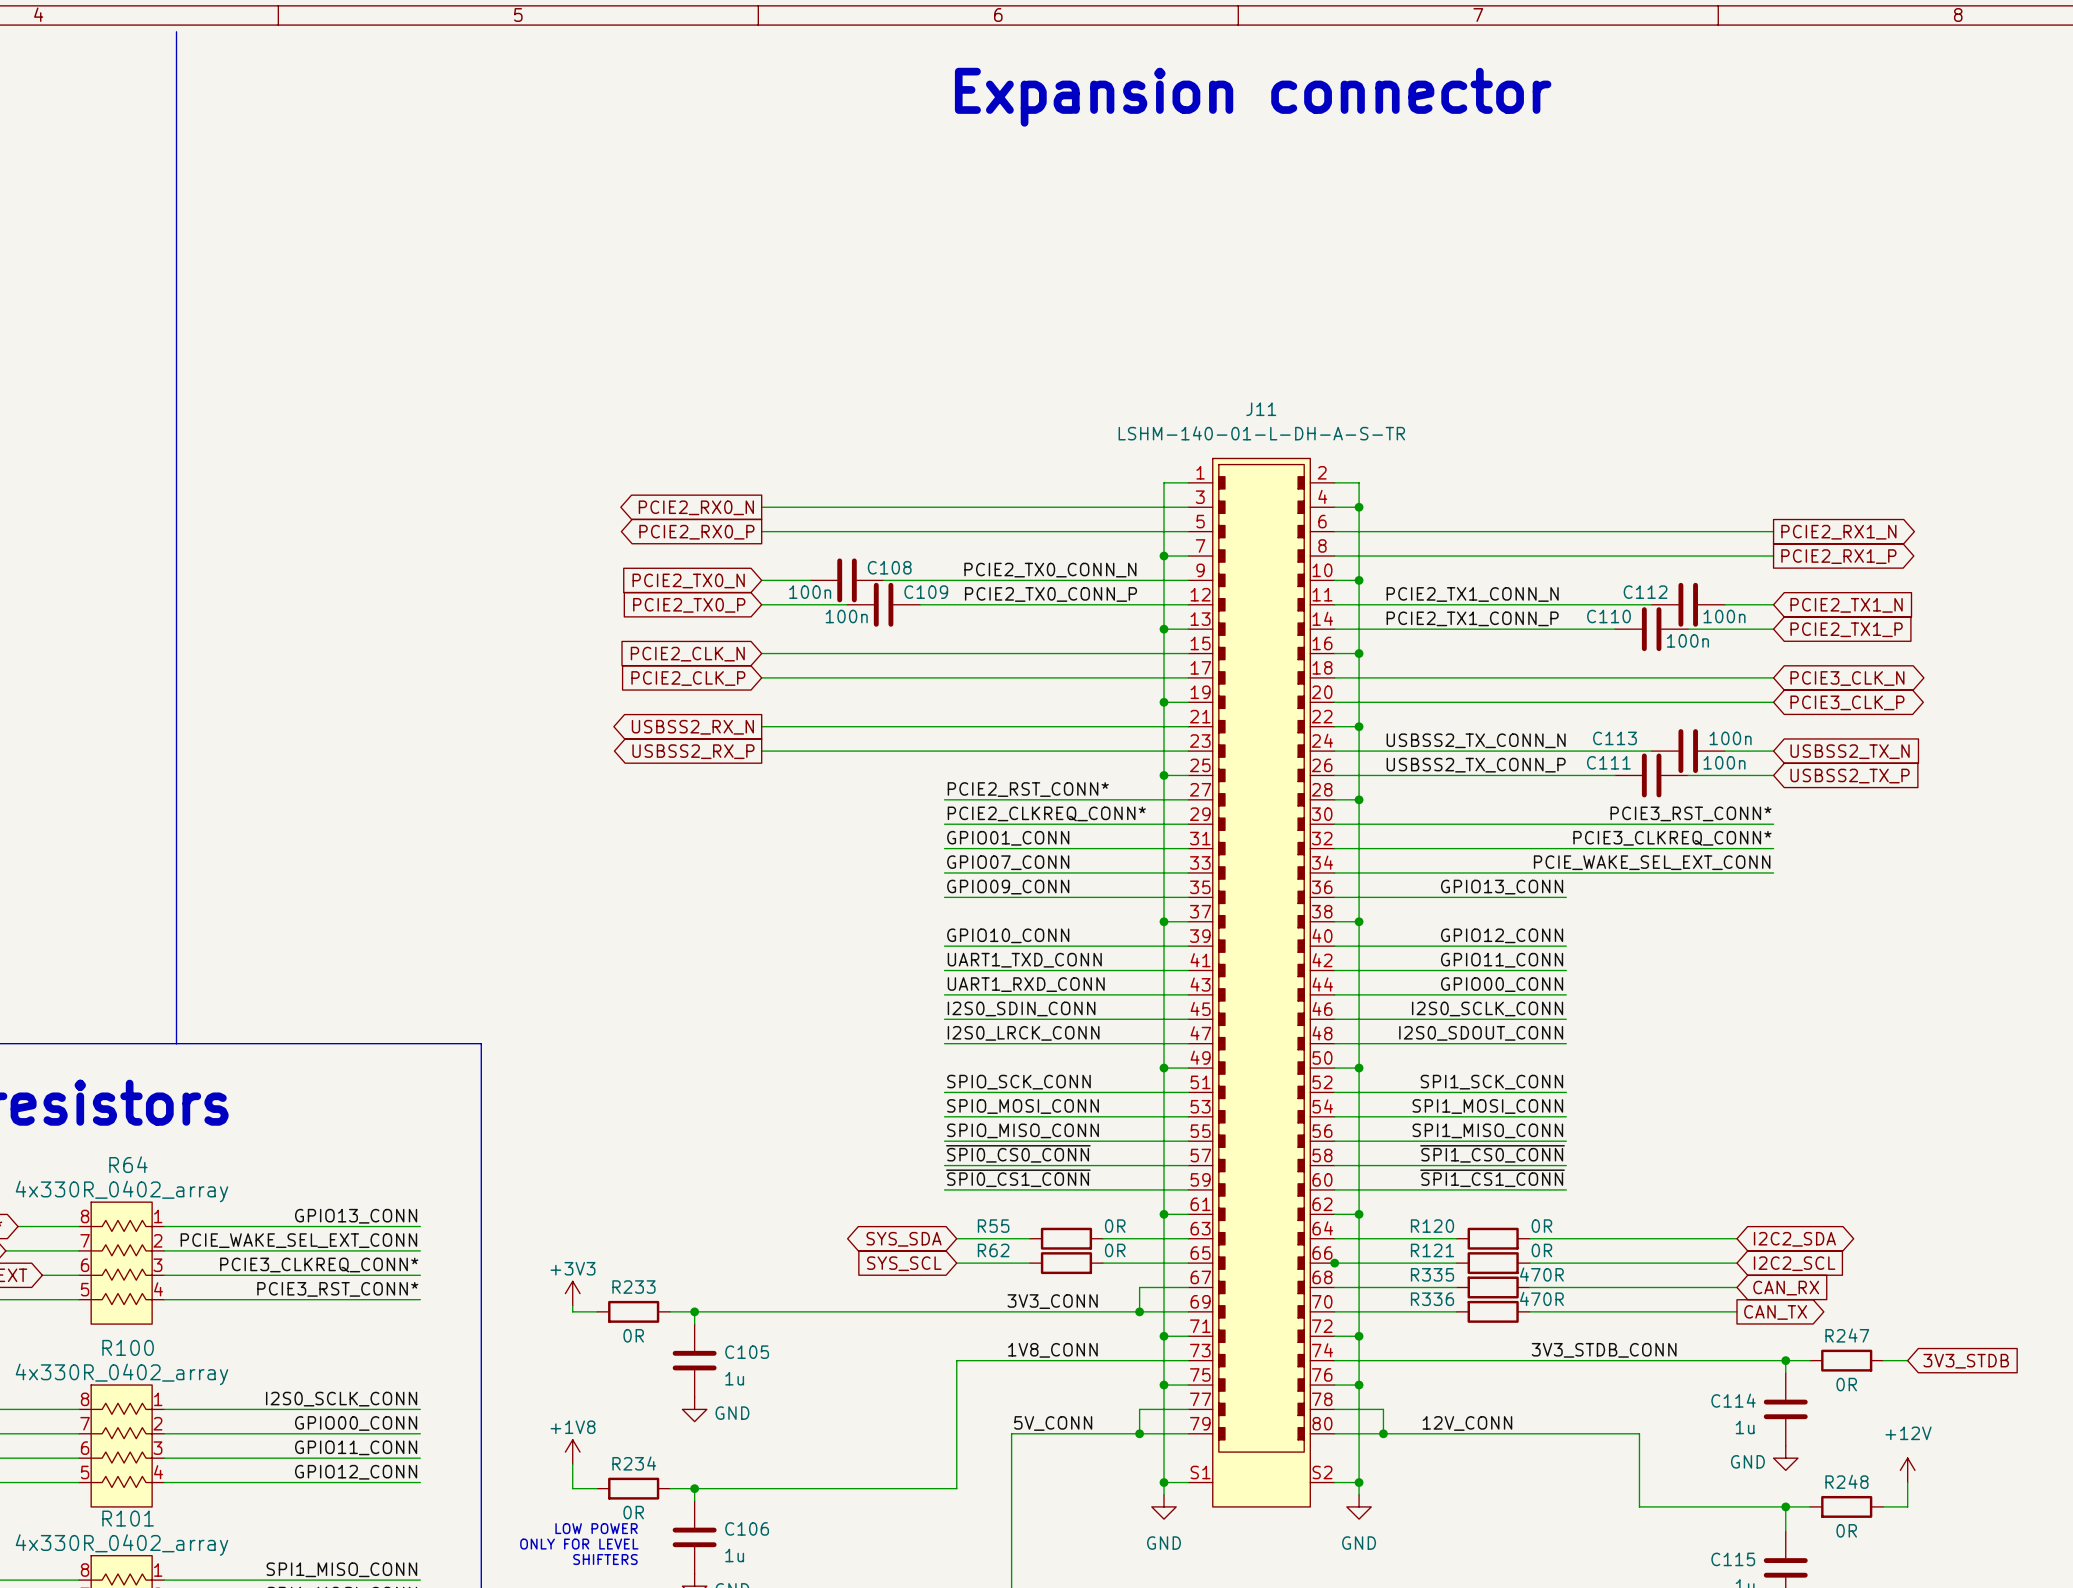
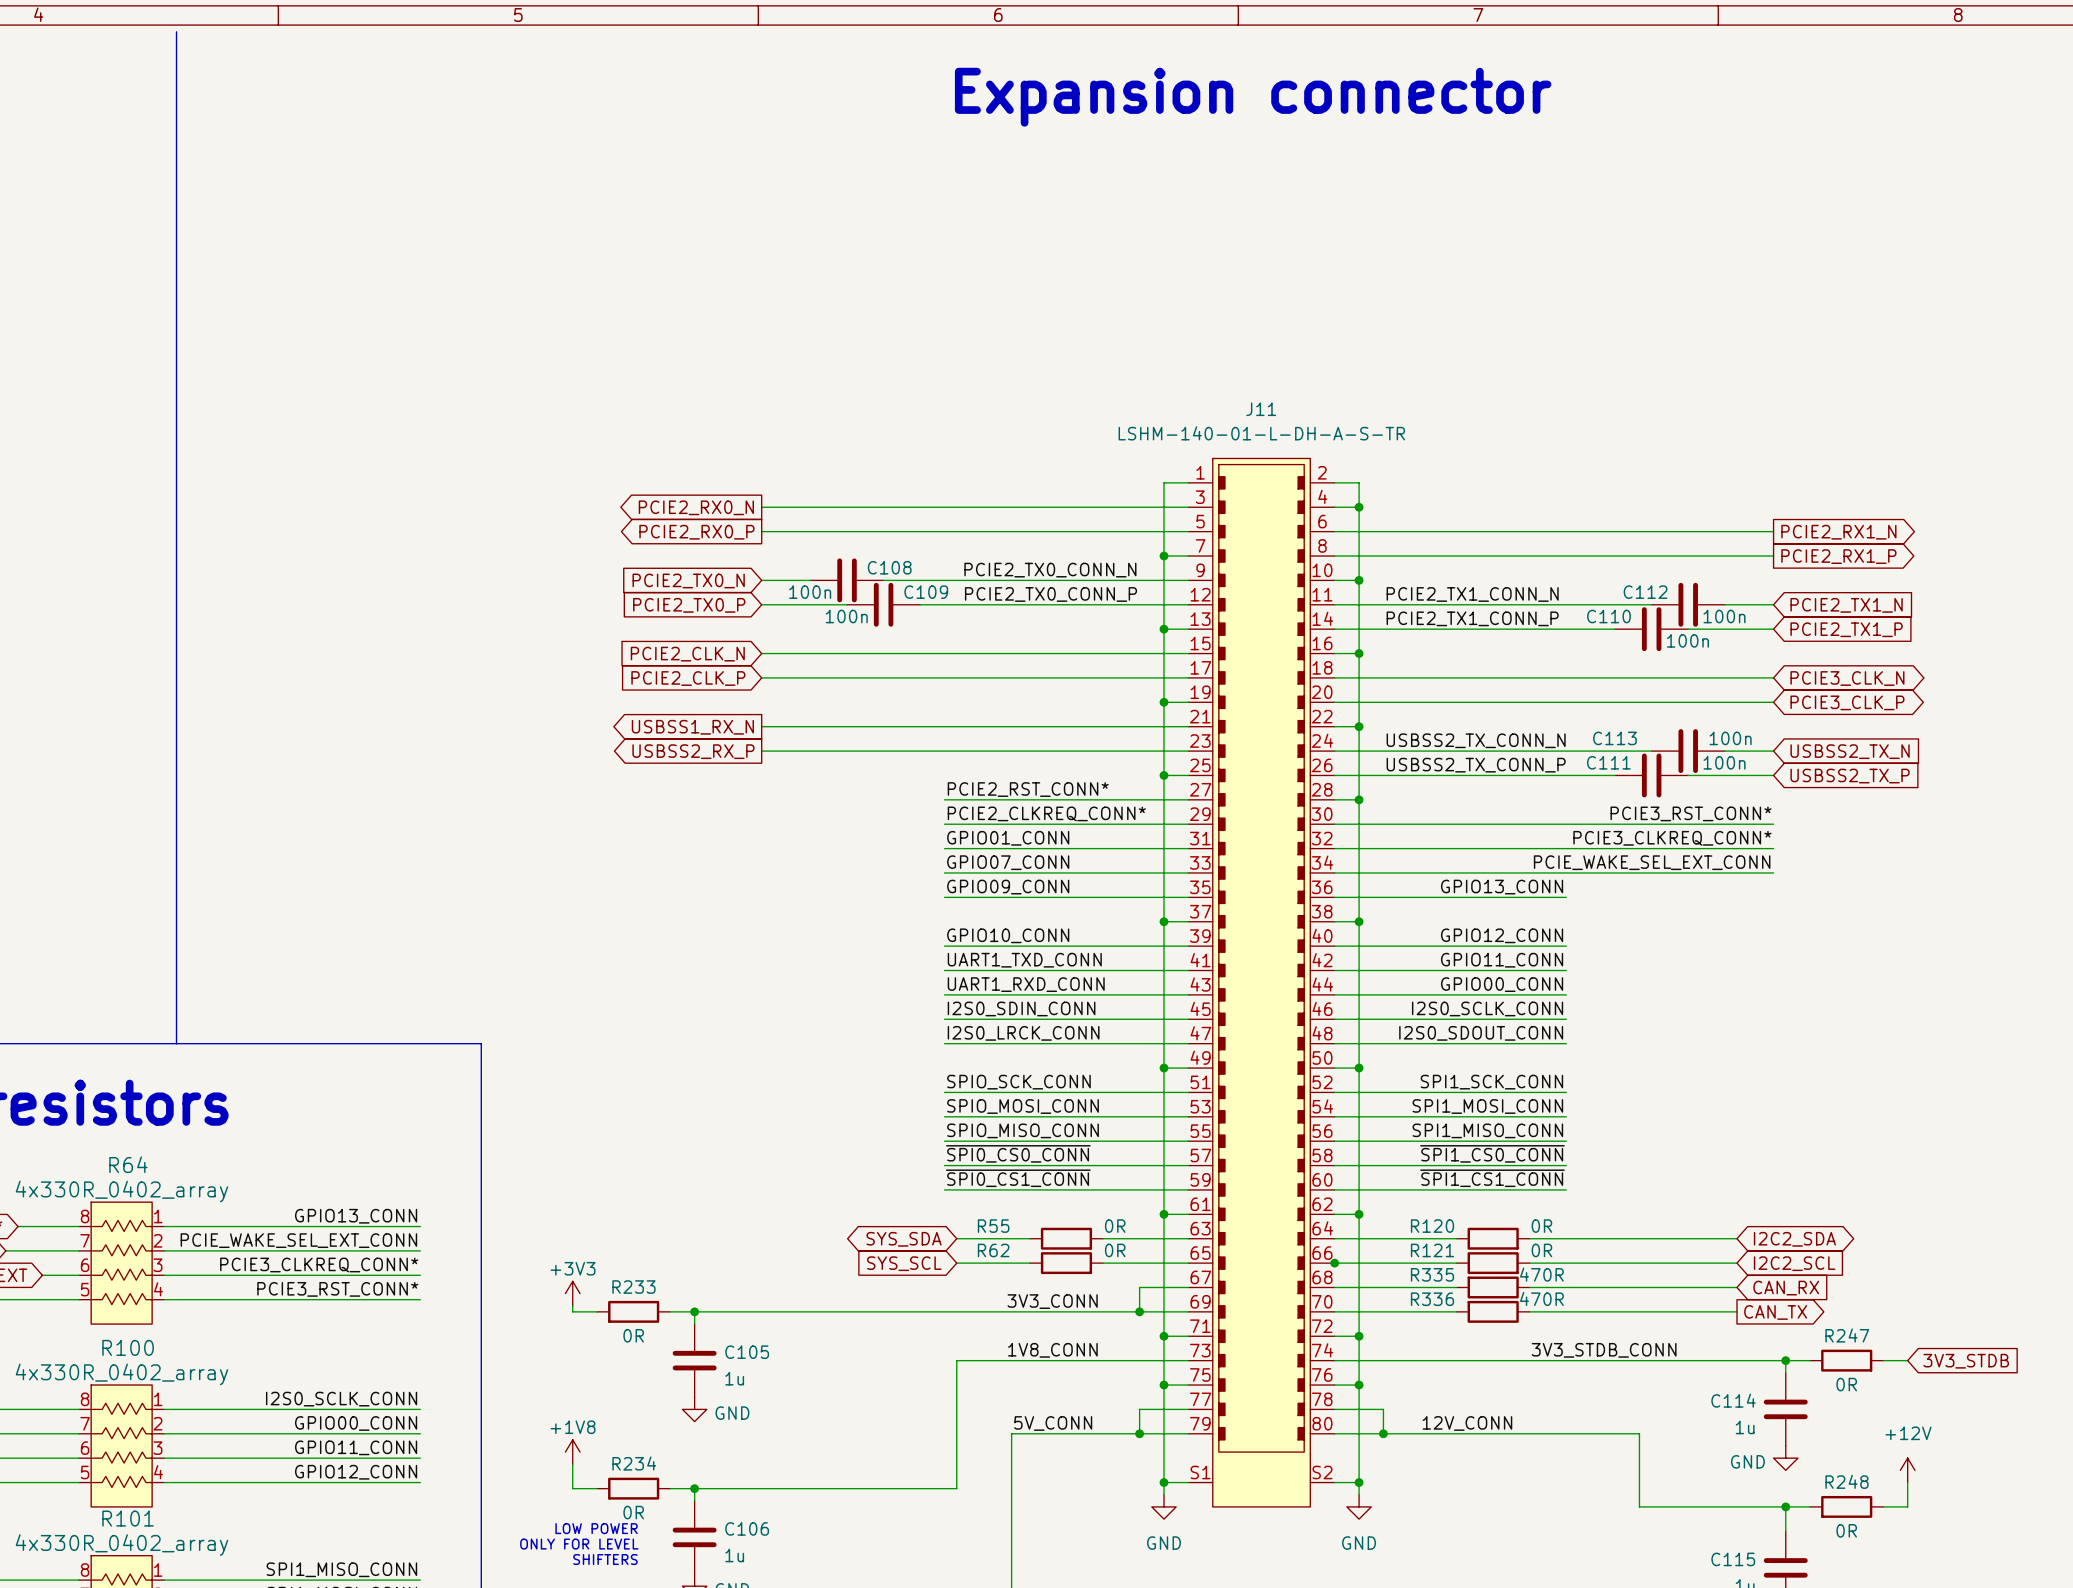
global label: USBSS2_RX_N (692, 727) -> USBSS1_RX_N (692, 727)

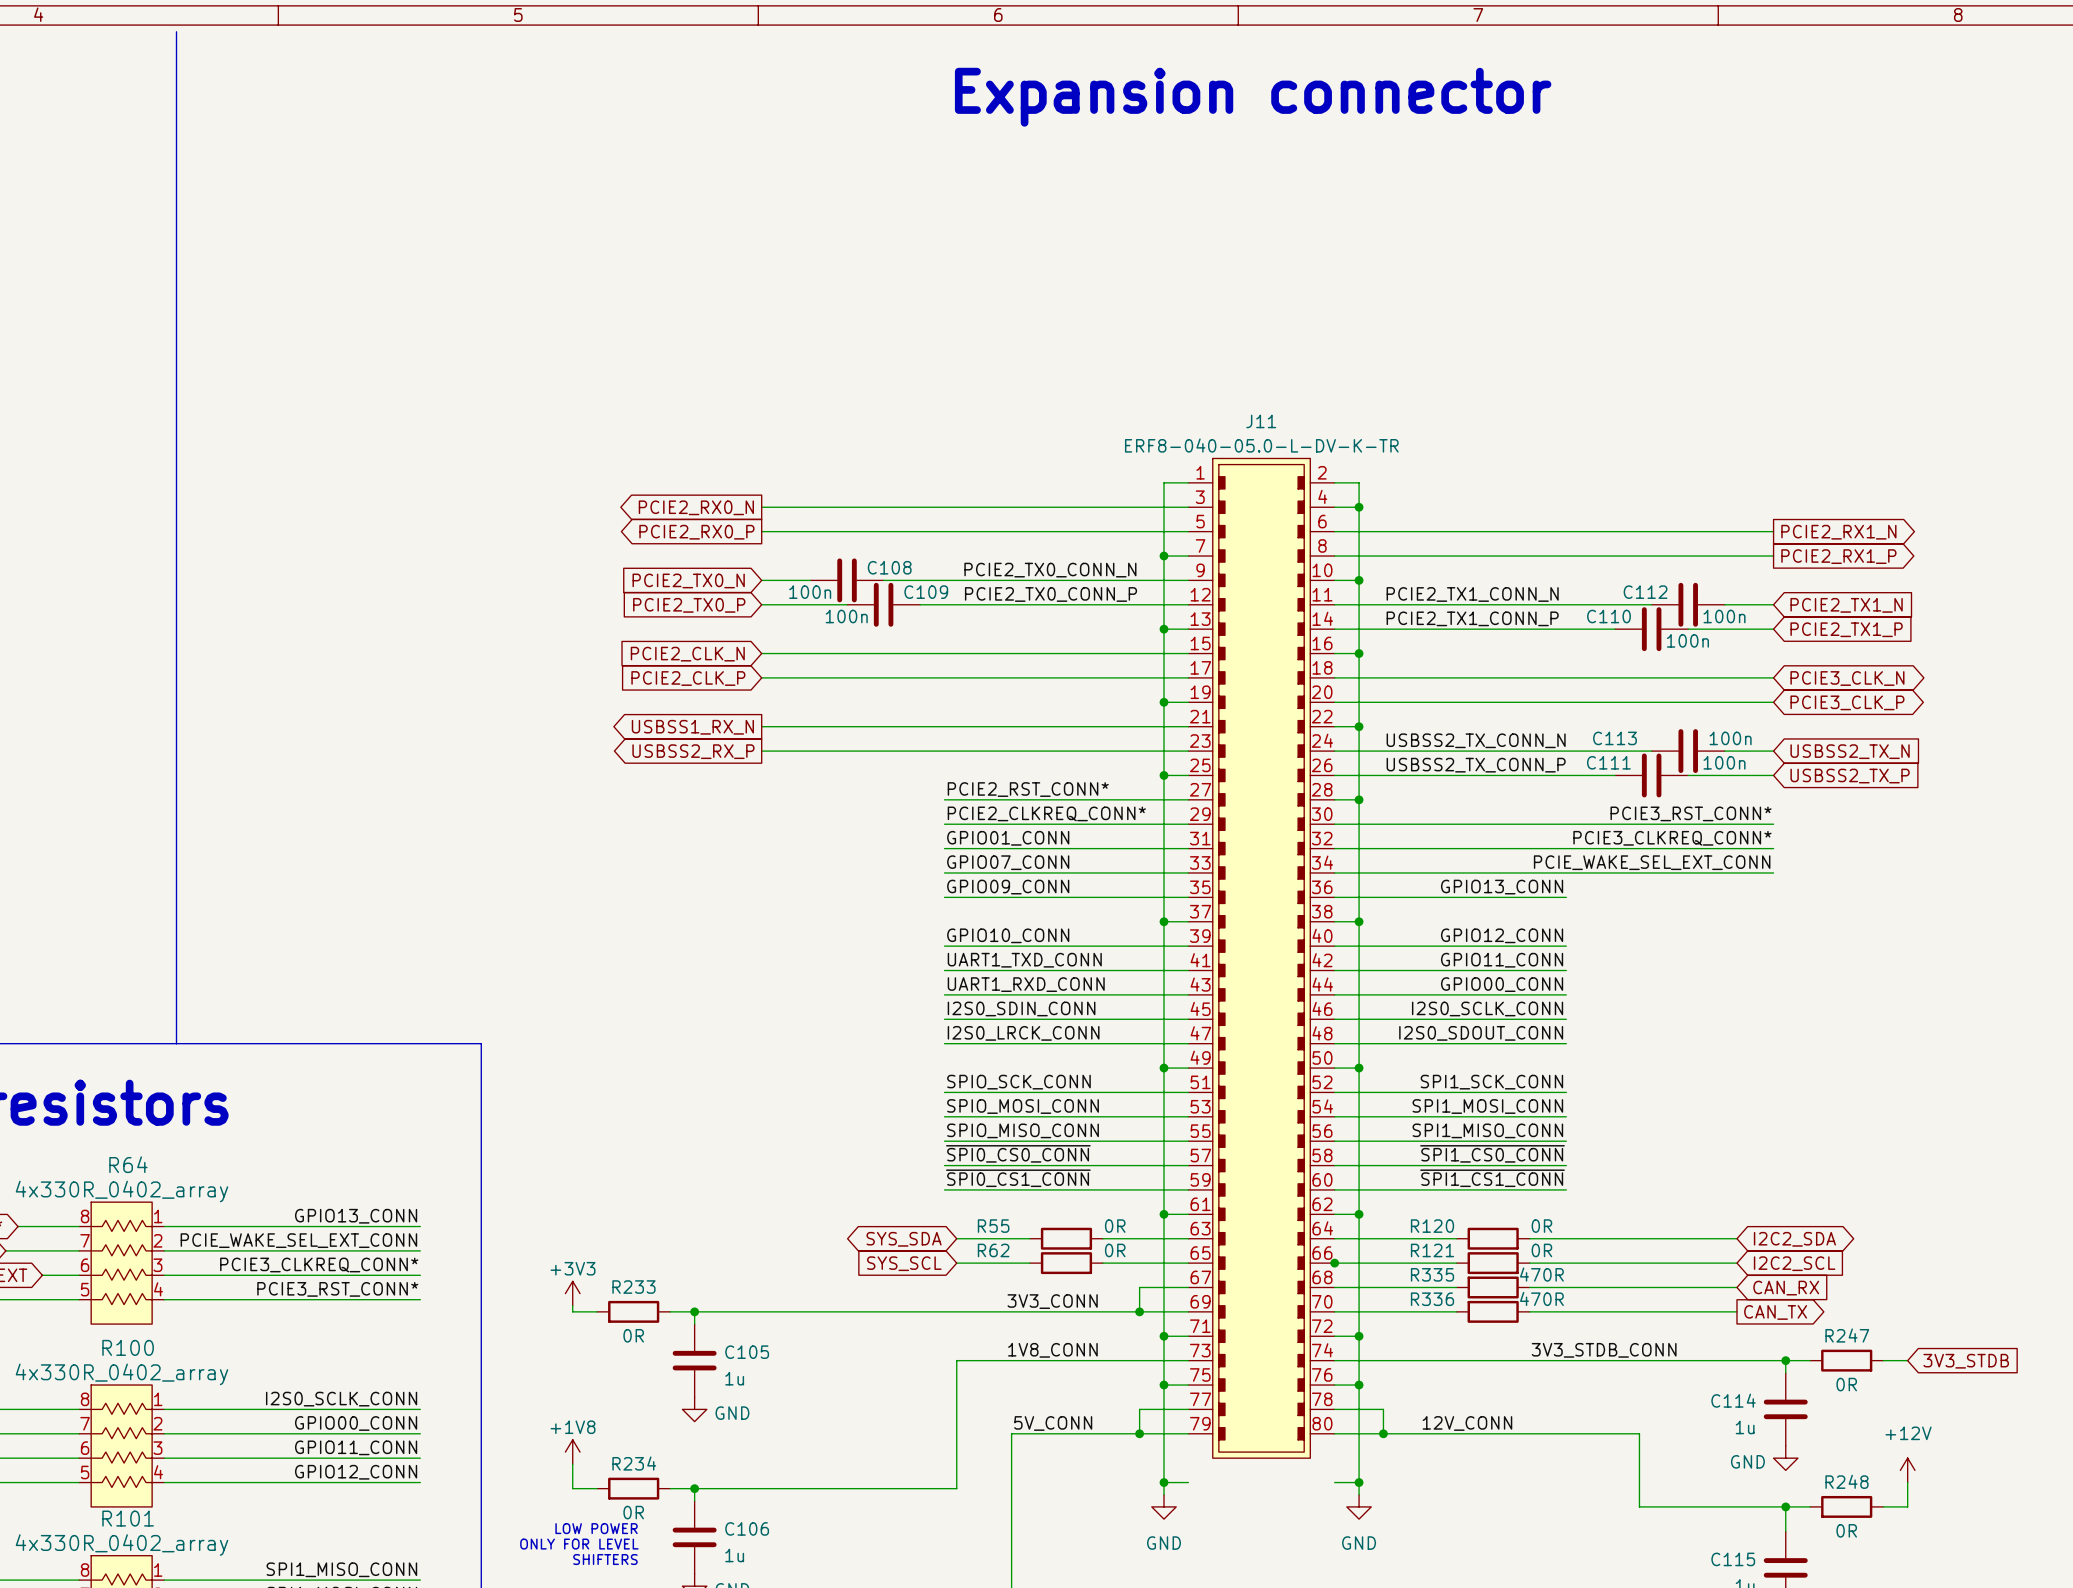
J11 name position: J11 (1261, 409) -> J11 (1261, 421)
J11 value: LSHM-140-01-L-DH-A-S-TR (1261, 433) -> ERF8-040-05.0-L-DV-K-TR (1261, 445)
J11 symbol: [1188, 458, 1335, 1507] -> [1188, 458, 1335, 1459]

